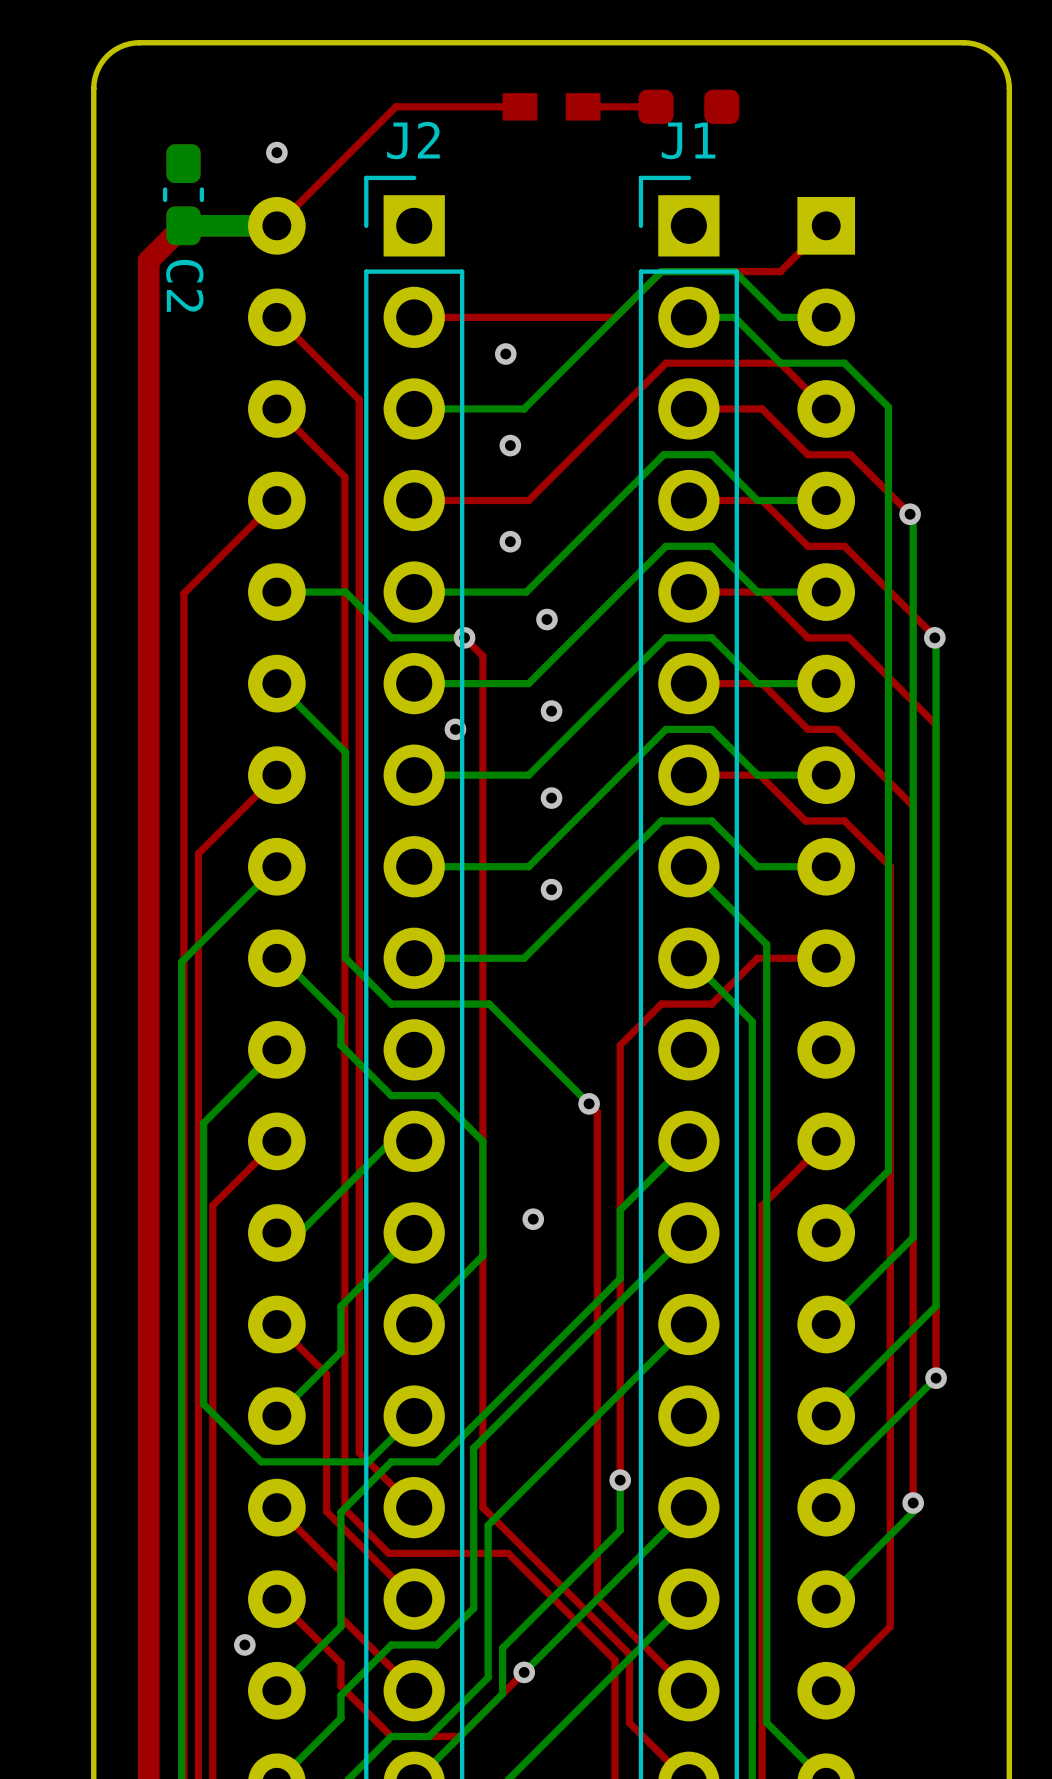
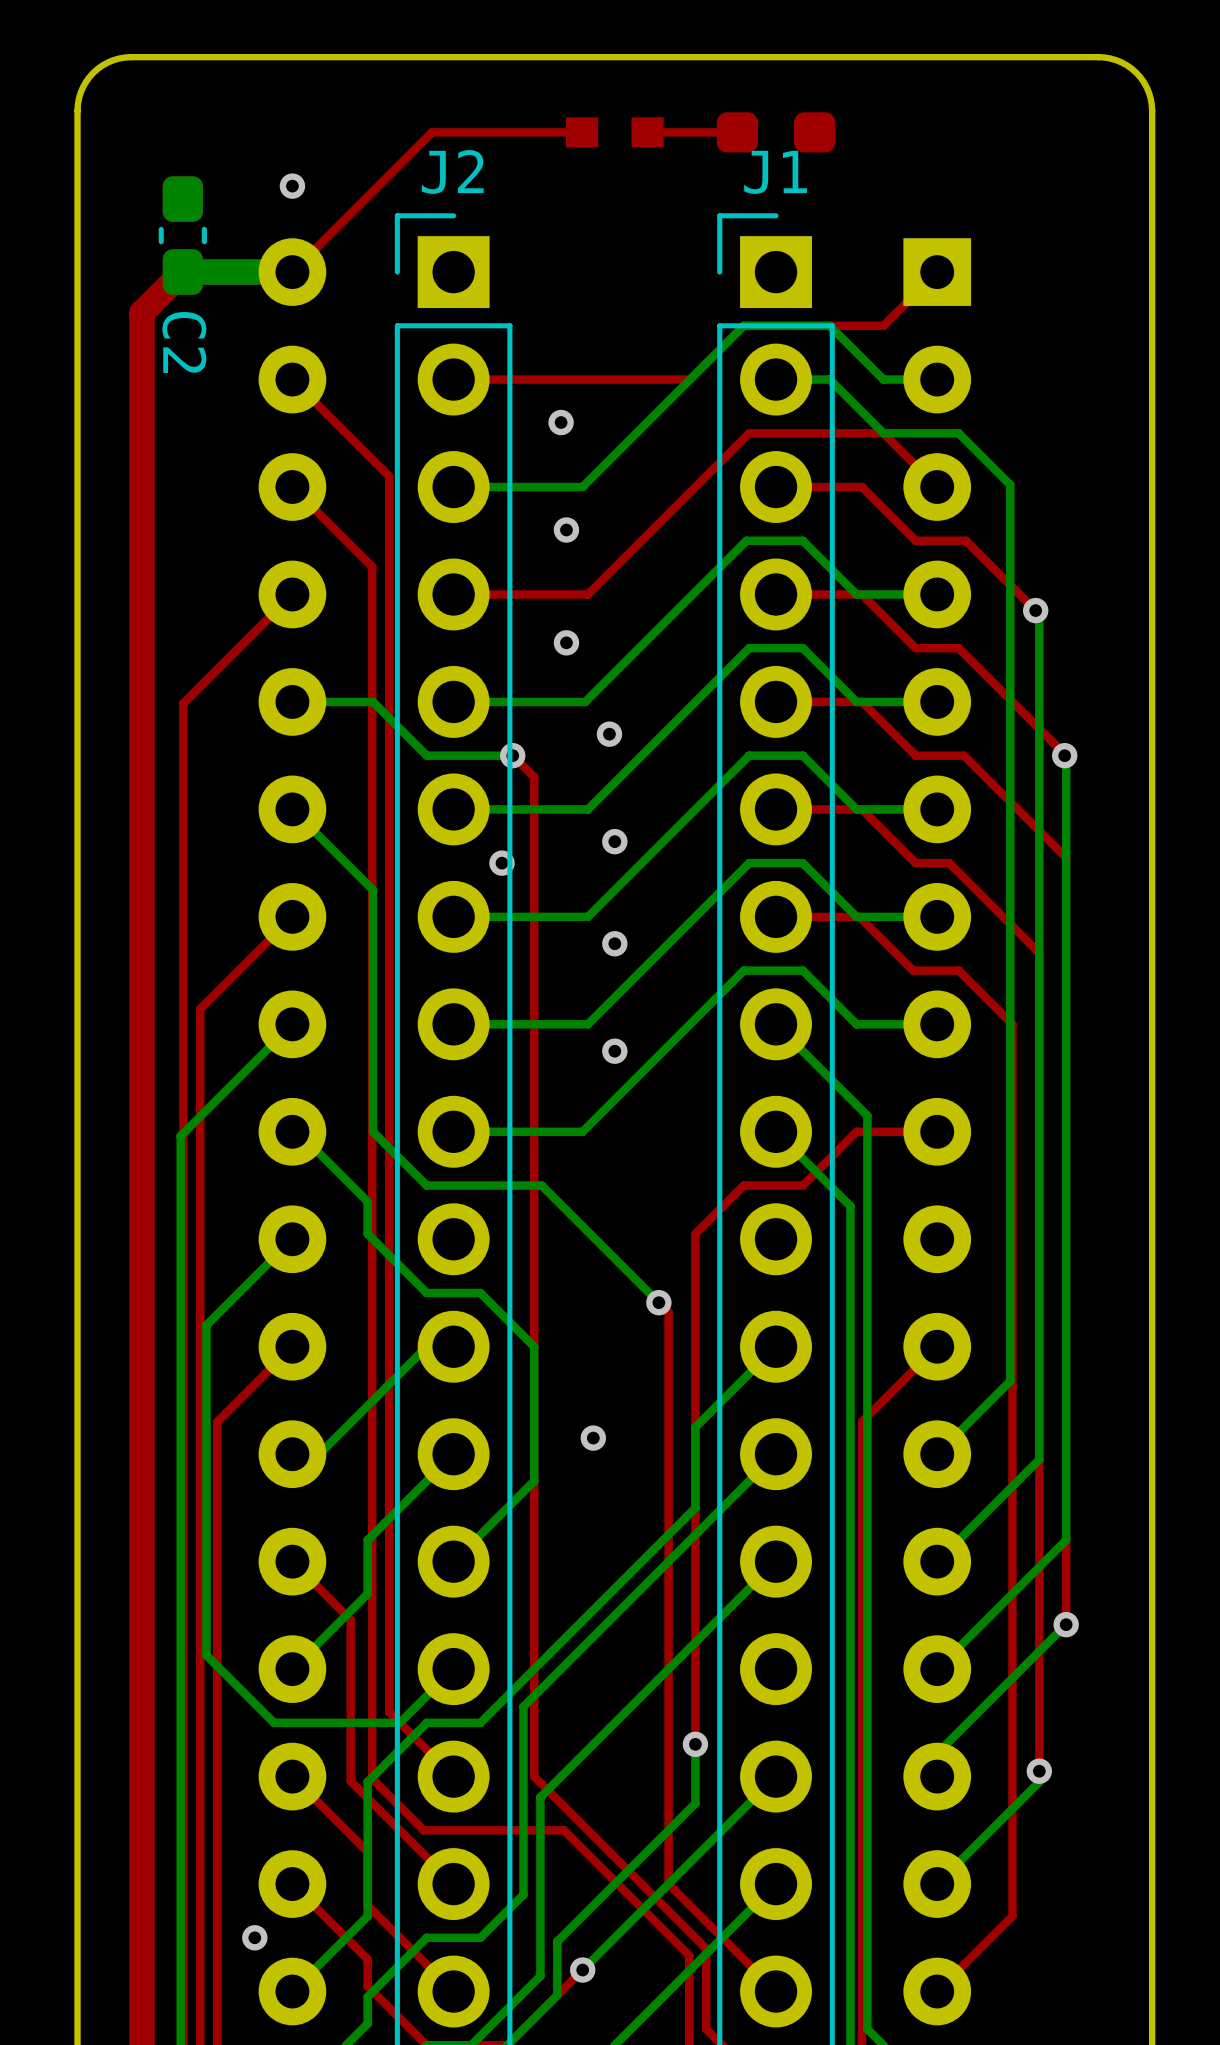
part footprint: [502, 93, 601, 121] -> [565, 117, 664, 148]

